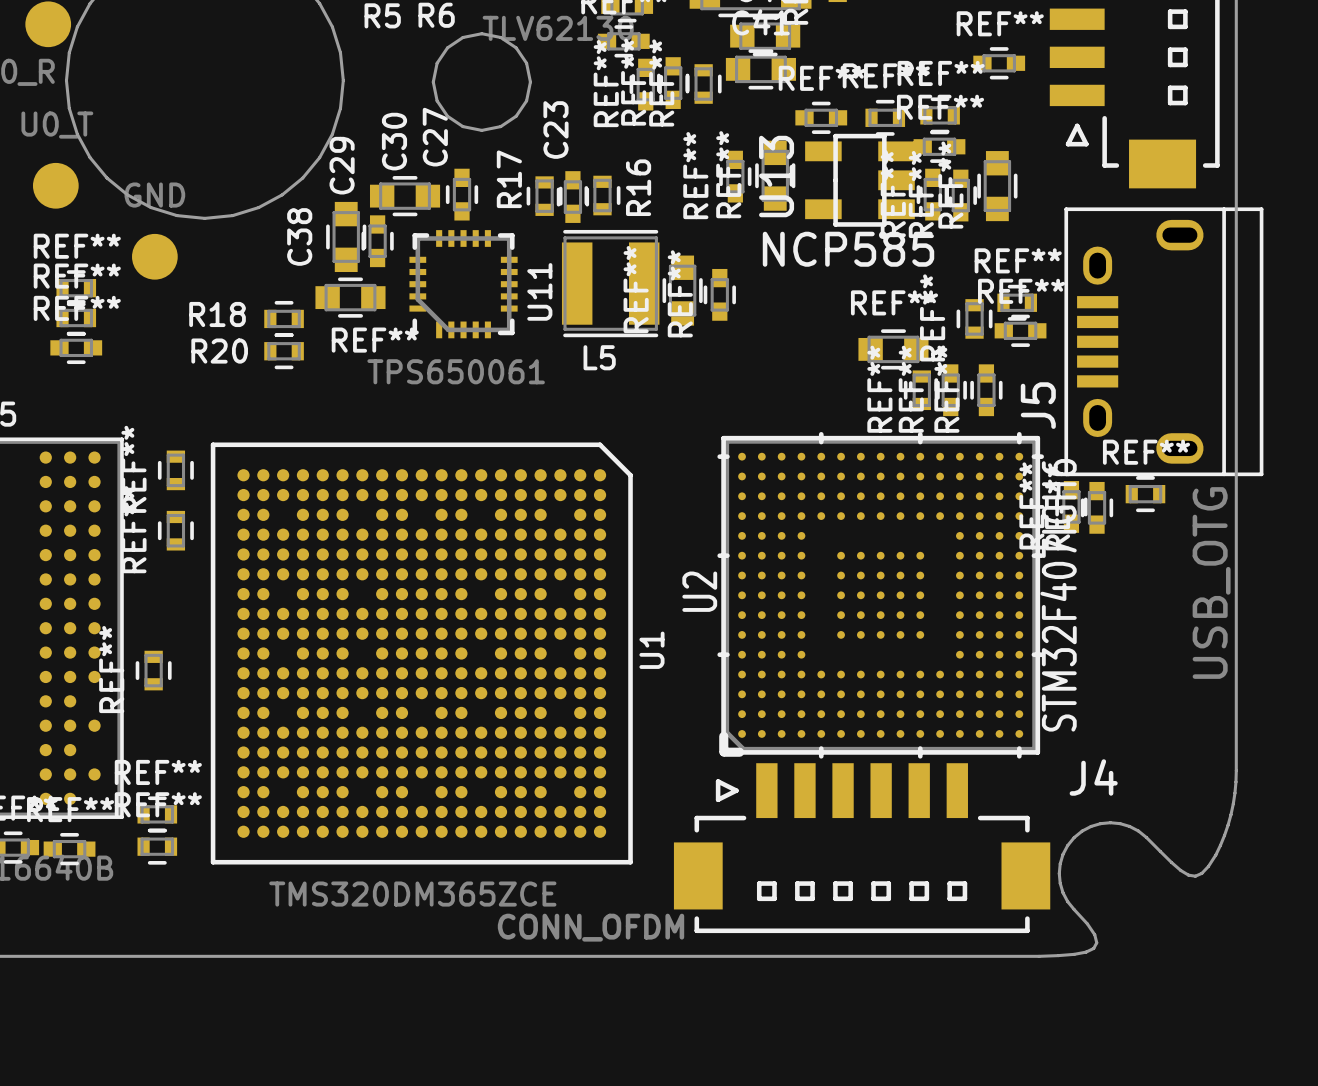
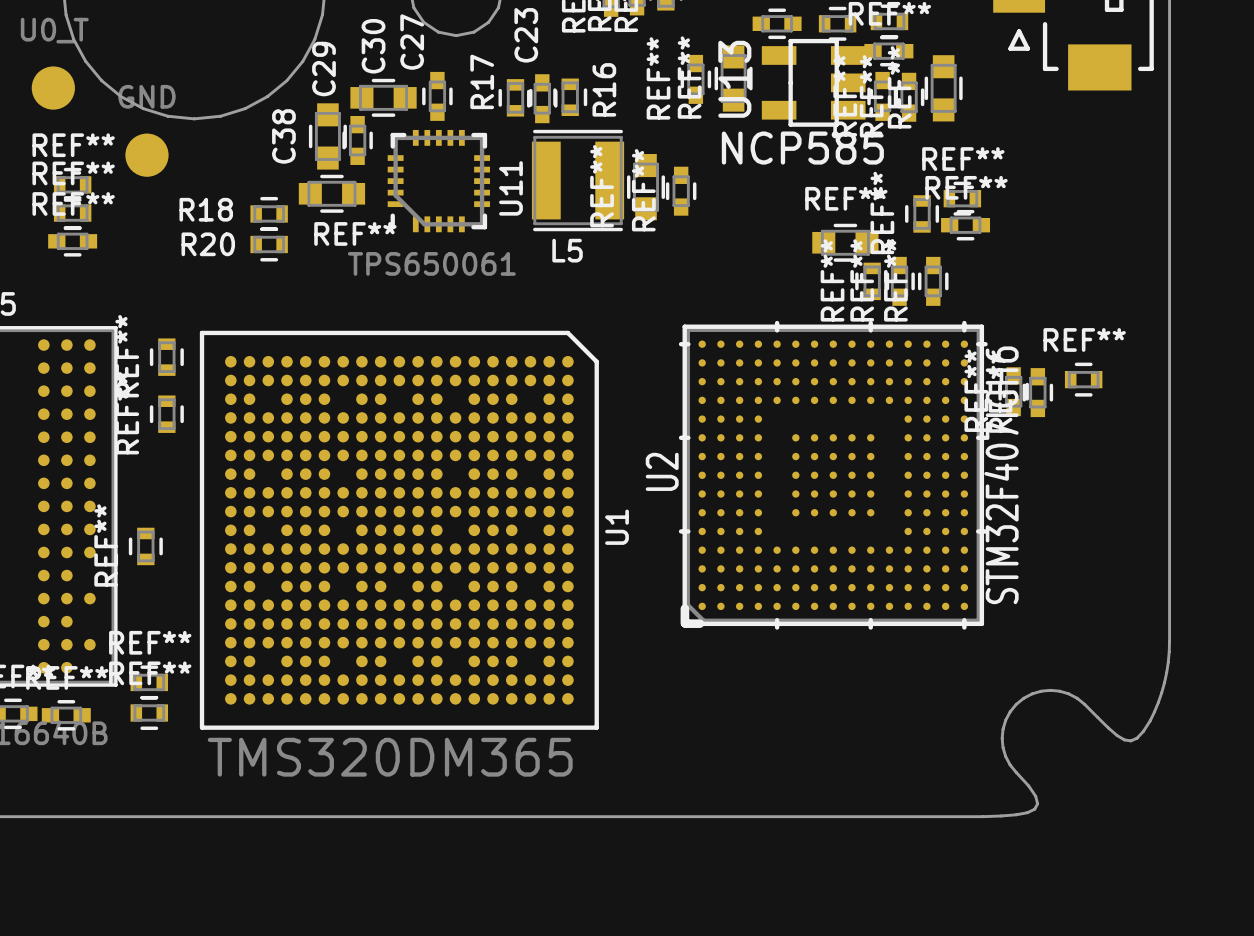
J5: USB_OTG (1163, 341) -> none
J4: CONN_OFDM (862, 848) -> none
U1 value: TMS320DM365ZCE (412, 894) -> TMS320DM365 (390, 757)

